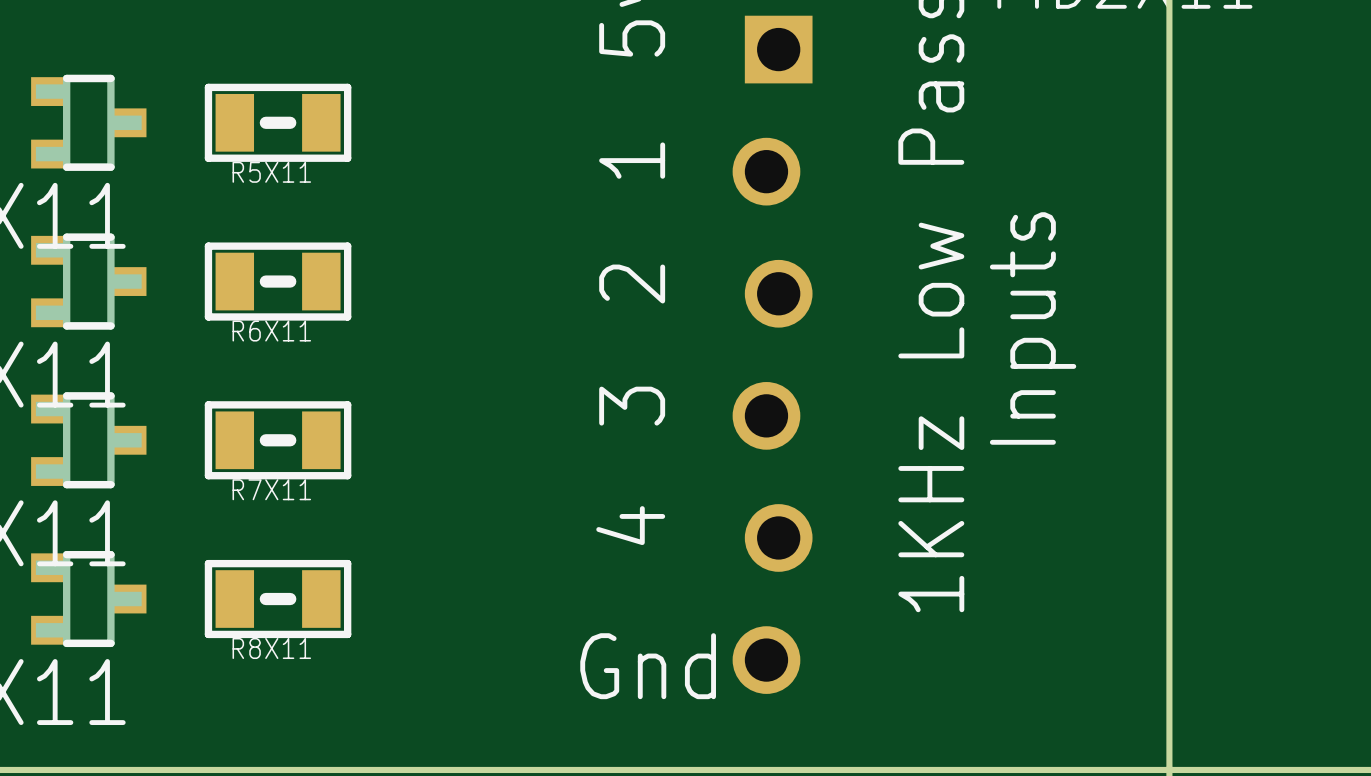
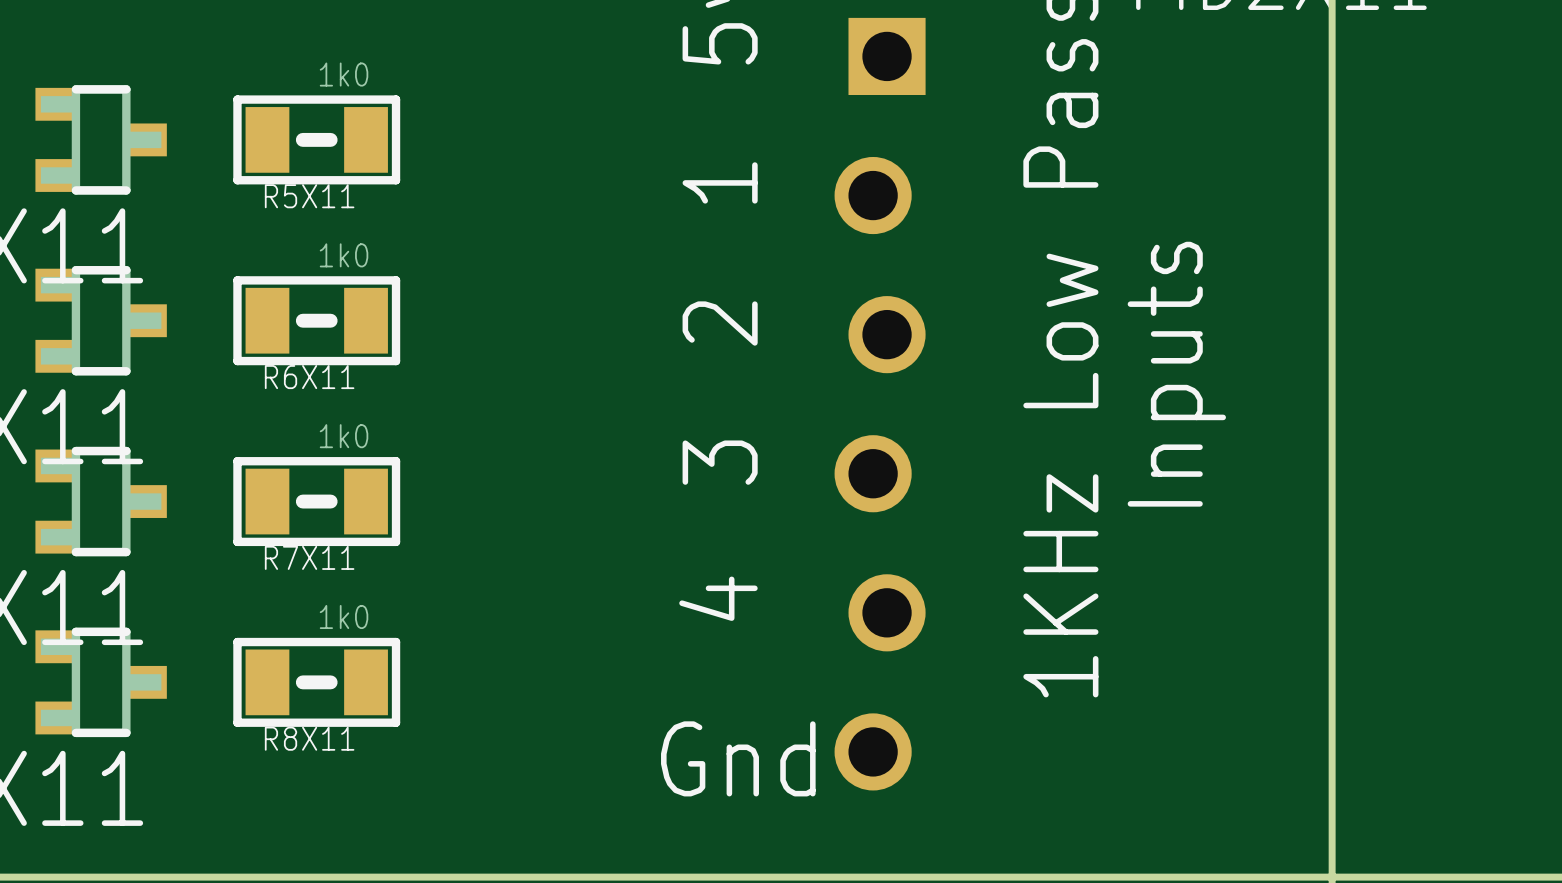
R5X11 value: none -> 1k0 (344, 74)
R6X11 value: none -> 1k0 (344, 255)
R7X11 value: none -> 1k0 (344, 436)
R8X11 value: none -> 1k0 (344, 617)

